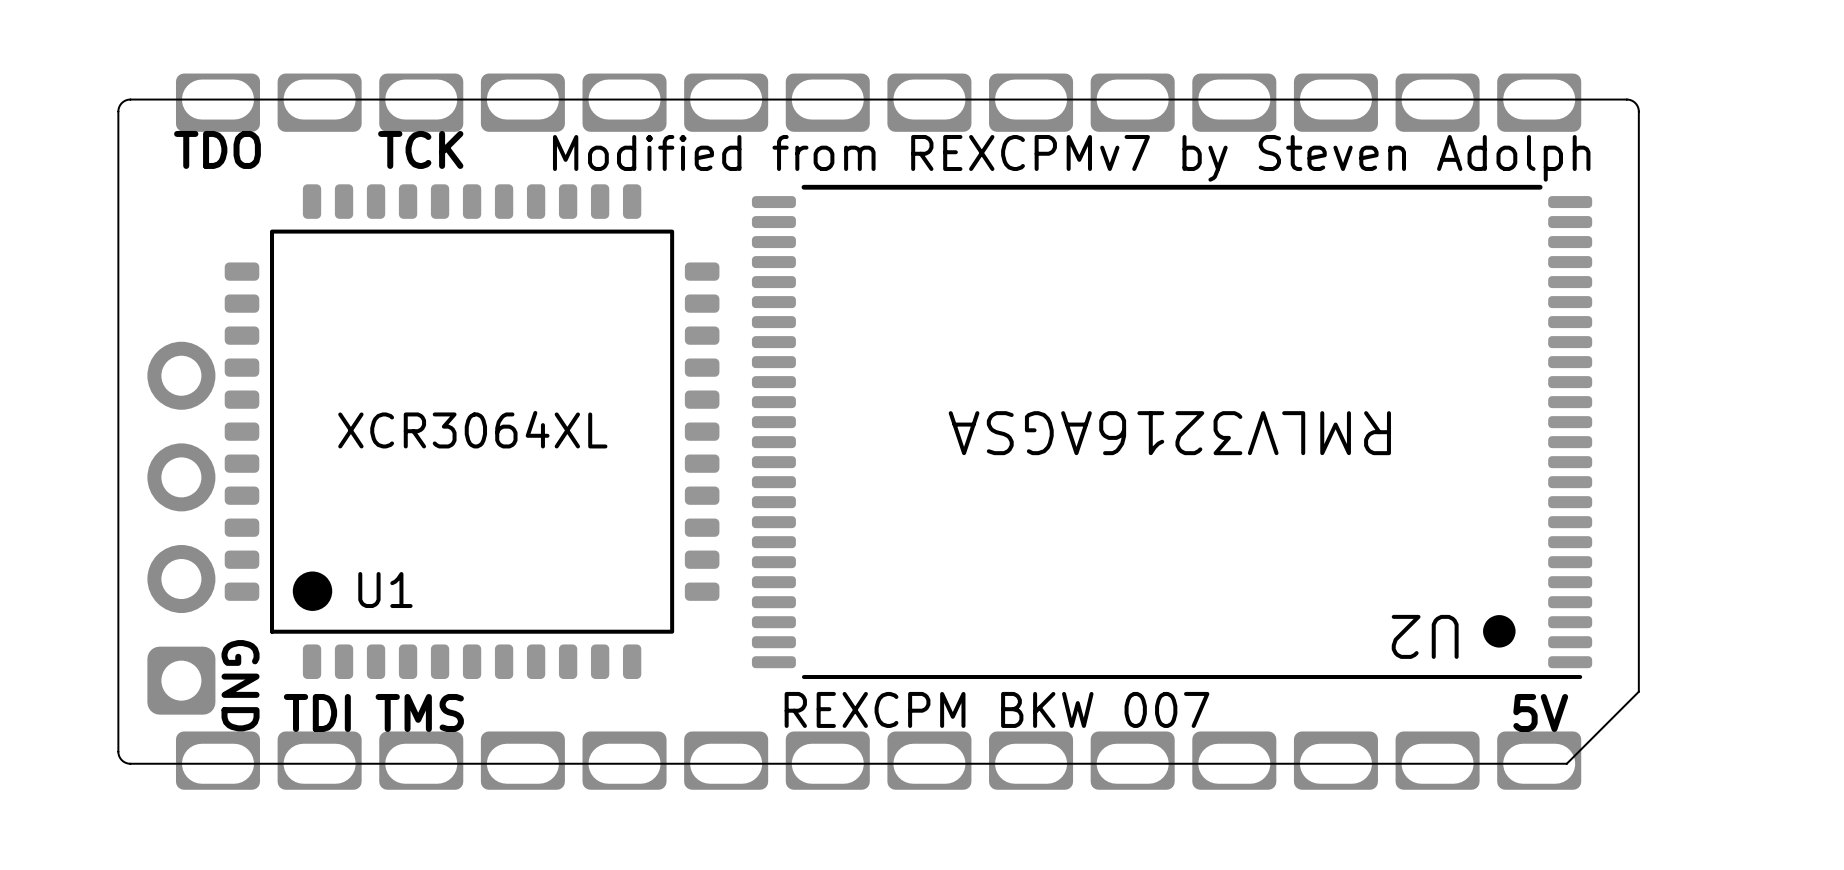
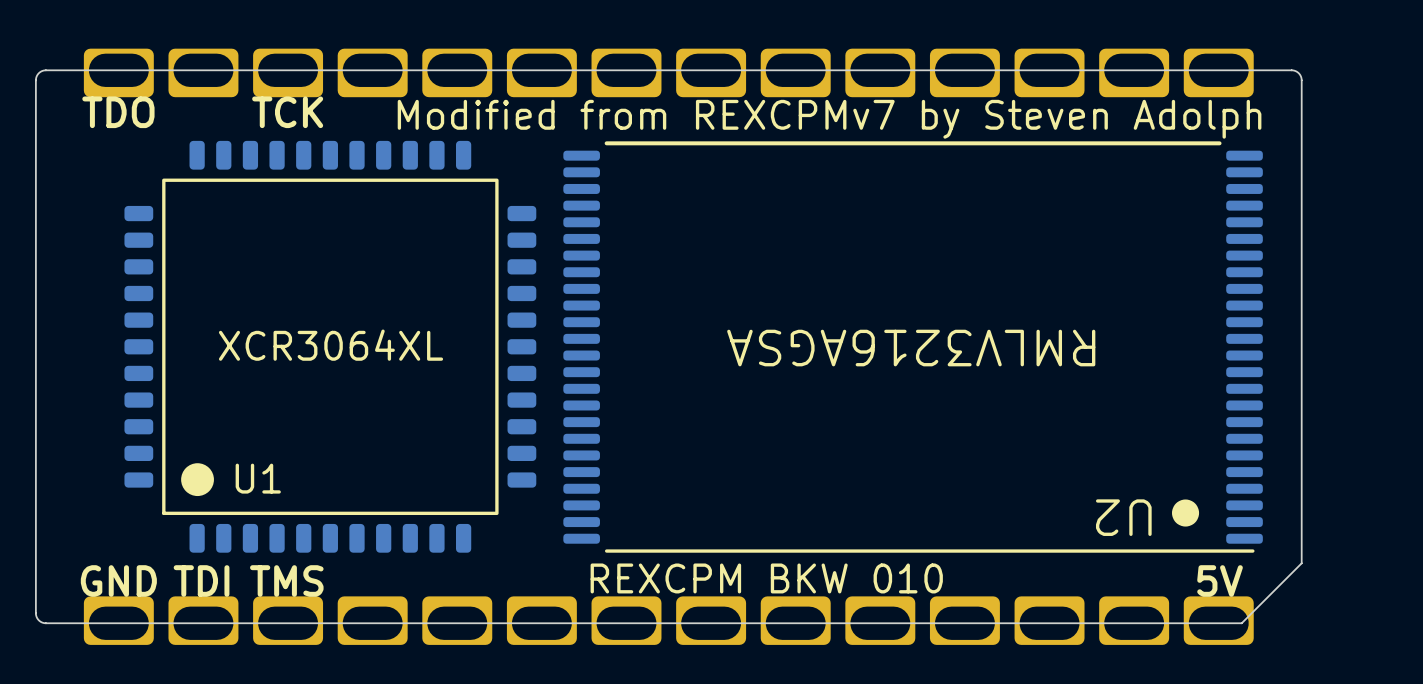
part: (181, 528) -> none
text rotation: 0° (240, 685) -> 90° counterclockwise (118, 581)
text: REXCPM BKW 007 (997, 709) -> REXCPM BKW 010 (766, 578)

